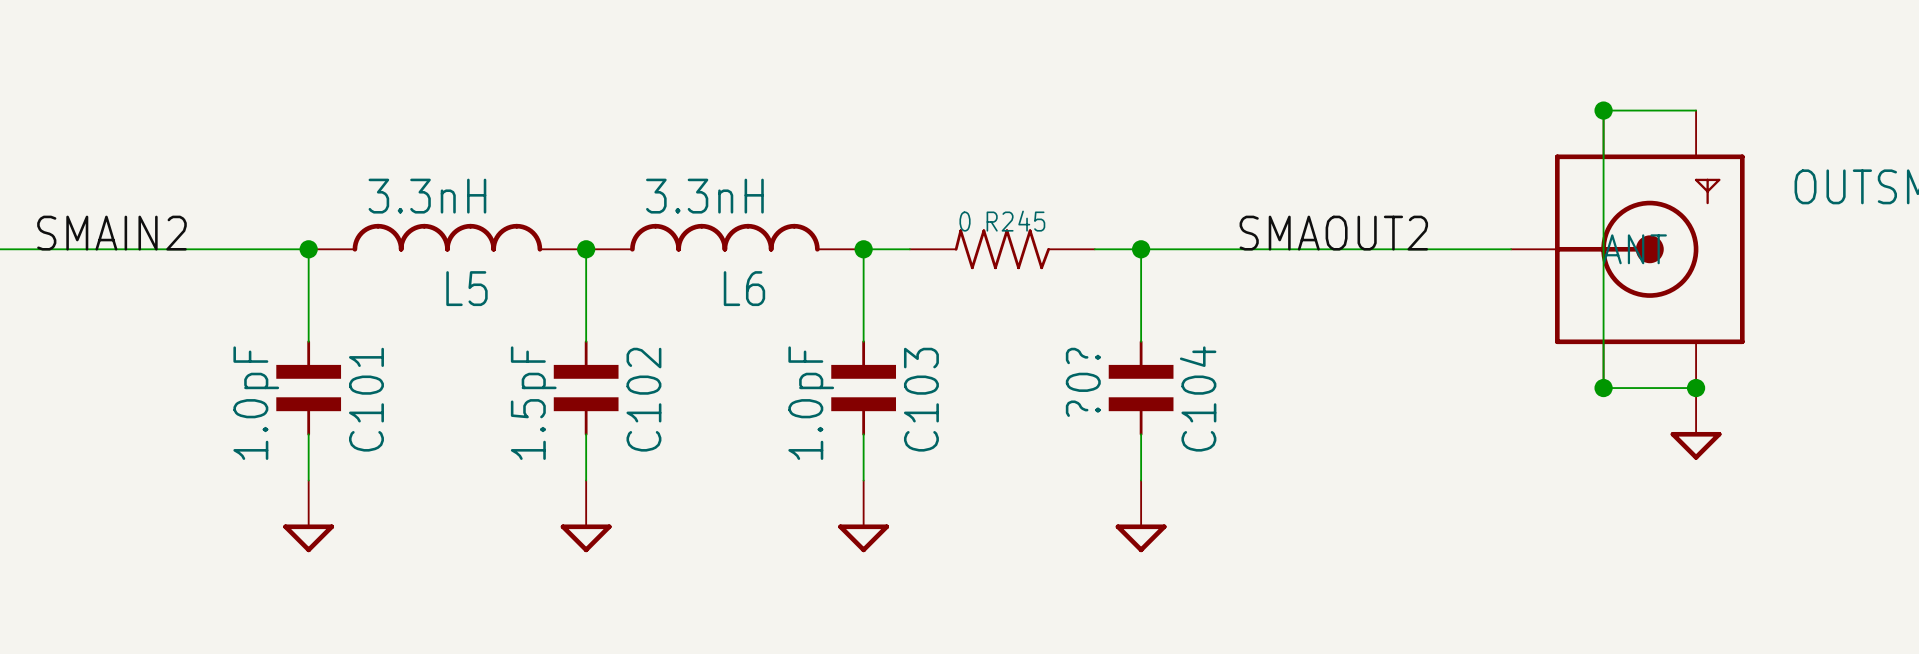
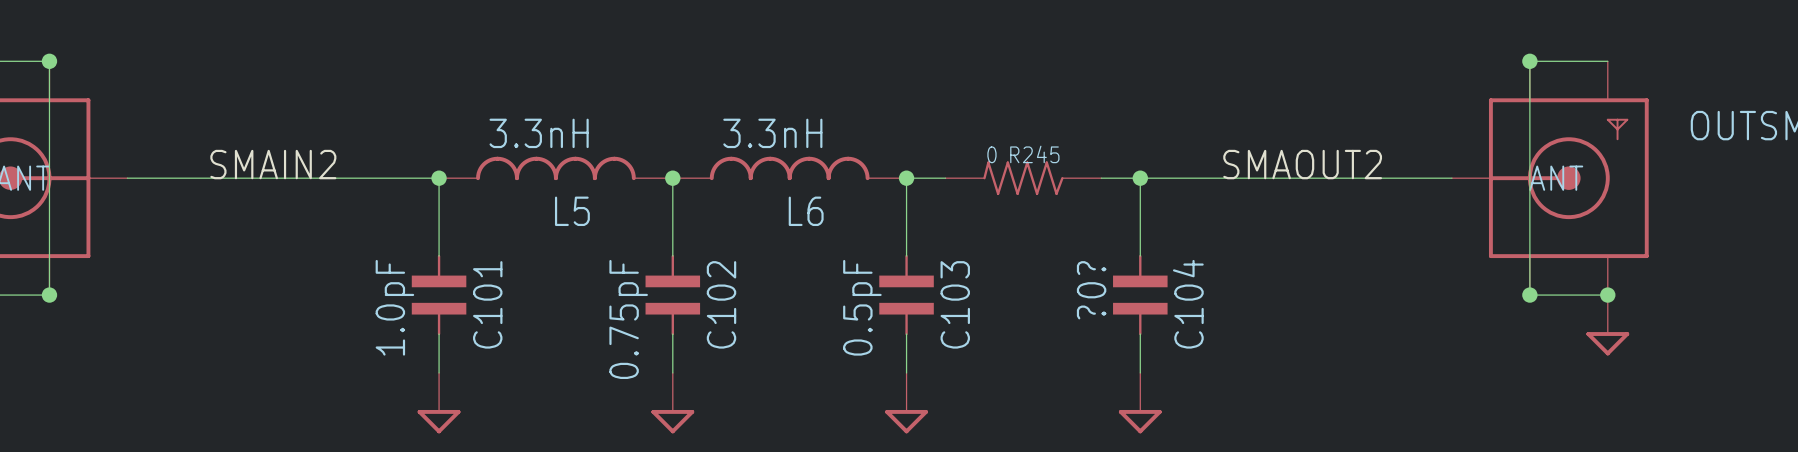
C102 value: 1.5pF (533, 403) -> 0.75pF (628, 319)
C103 value: 1.0pF (811, 403) -> 0.5pF (862, 307)

